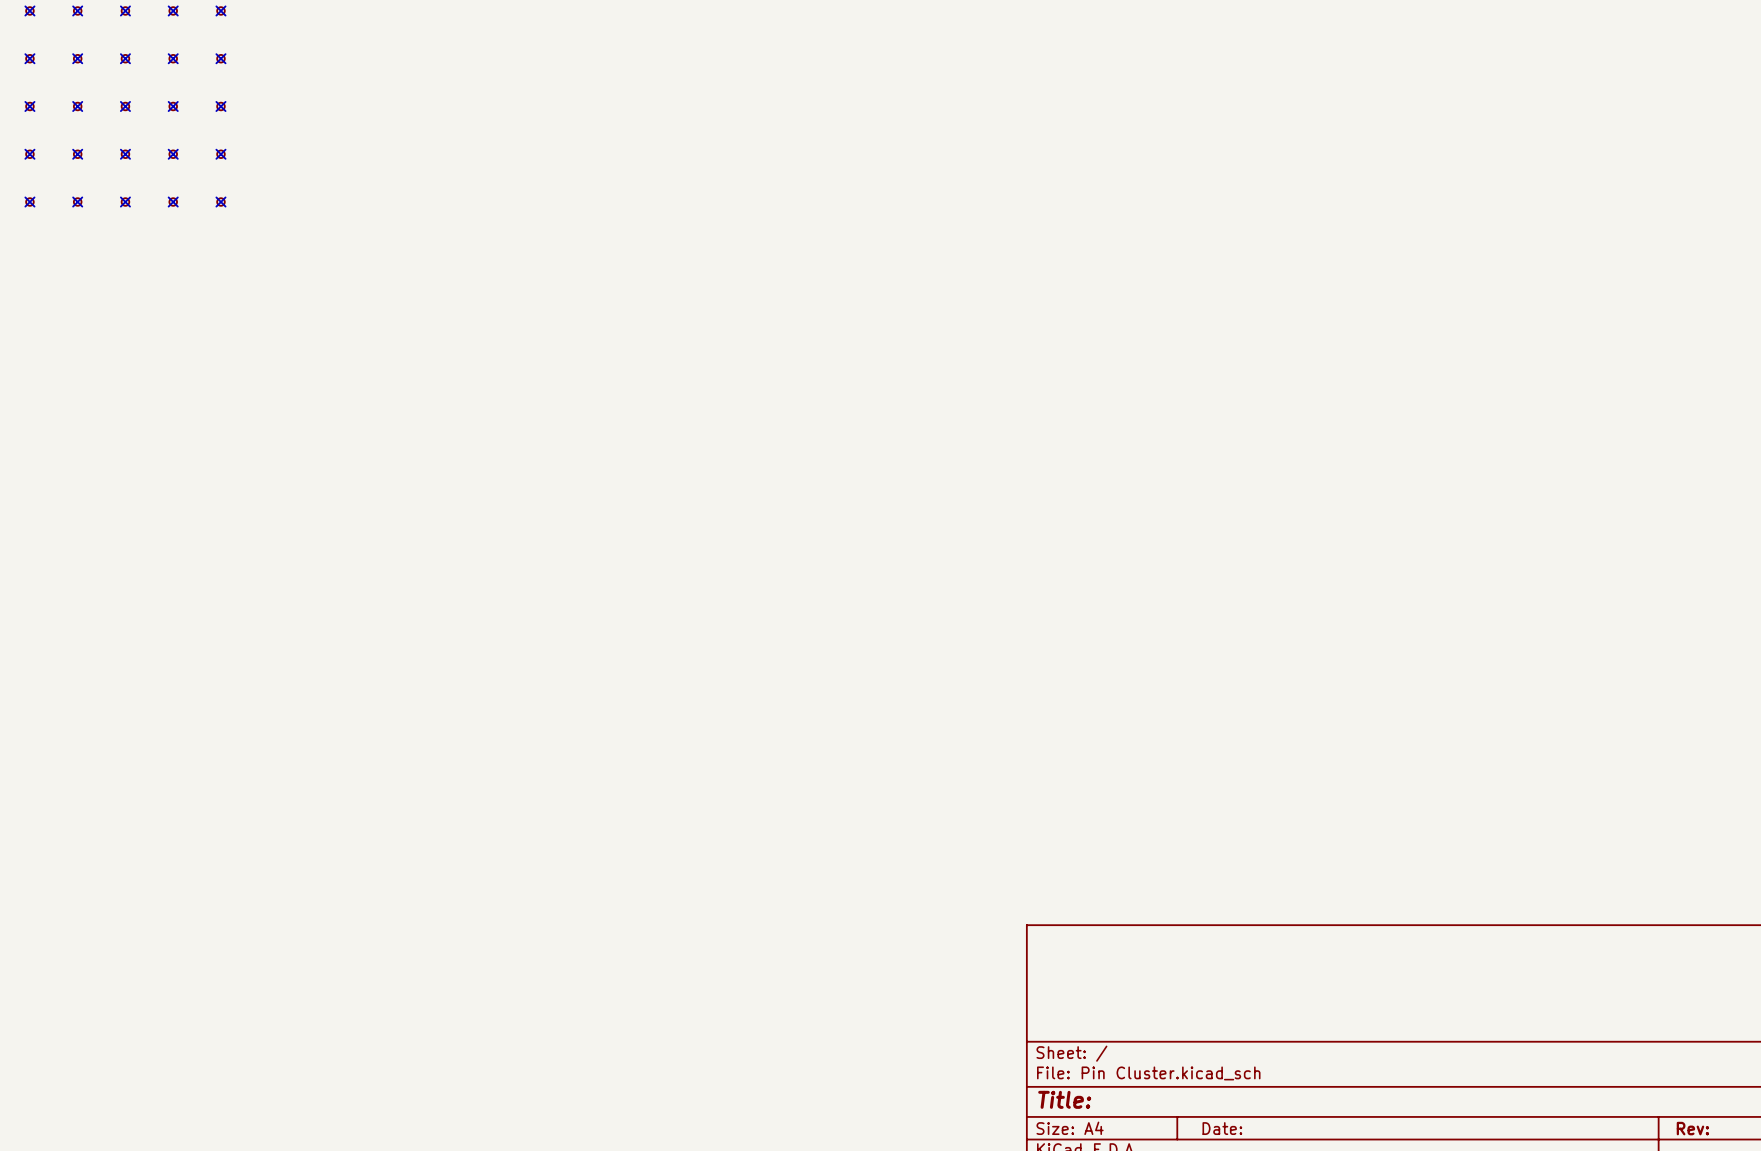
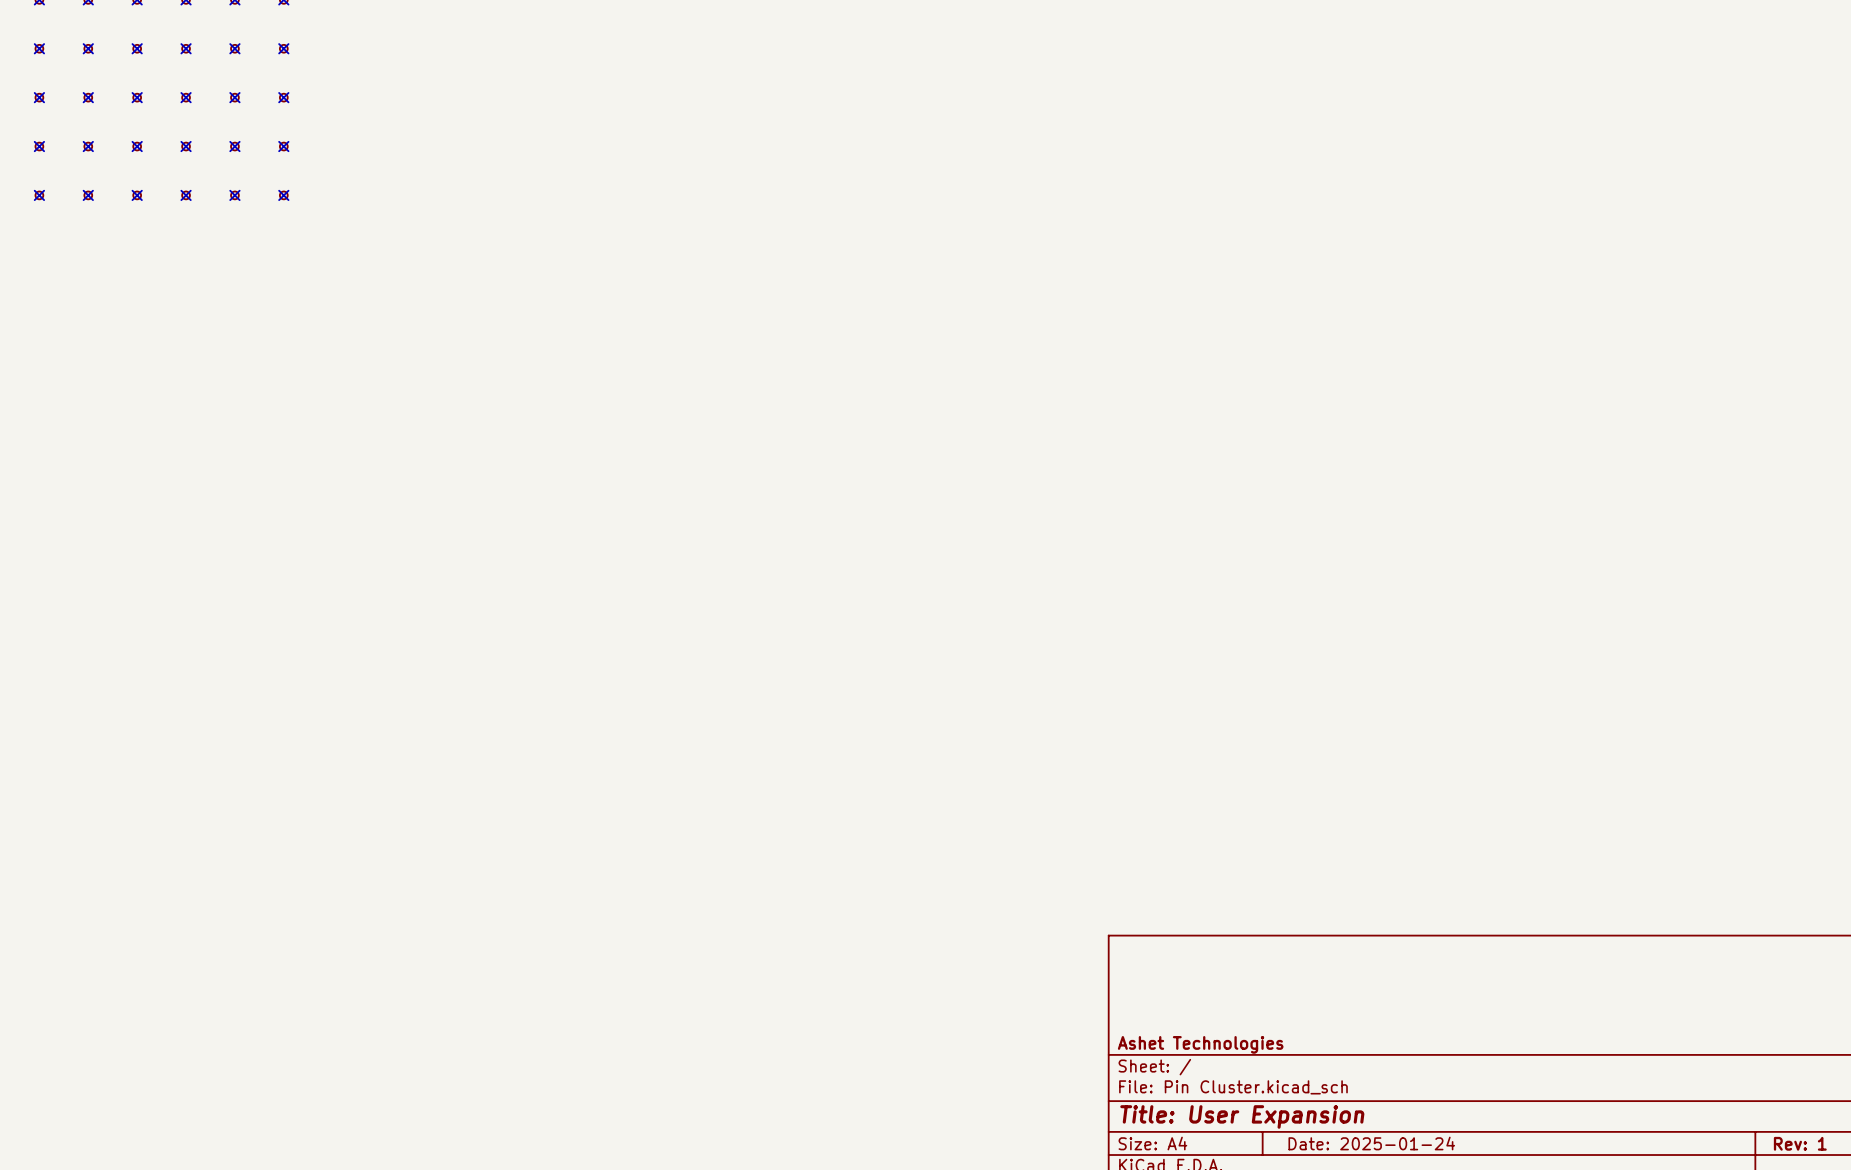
title block: none -> Ashet Technologies (1200, 1044)
title block: Title: (1064, 1099) -> Title: User Expansion (1242, 1116)
title block: Date: (1222, 1128) -> Date: 2025-01-24 (1371, 1143)
title block: Rev: (1692, 1128) -> Rev: 1 (1800, 1143)

